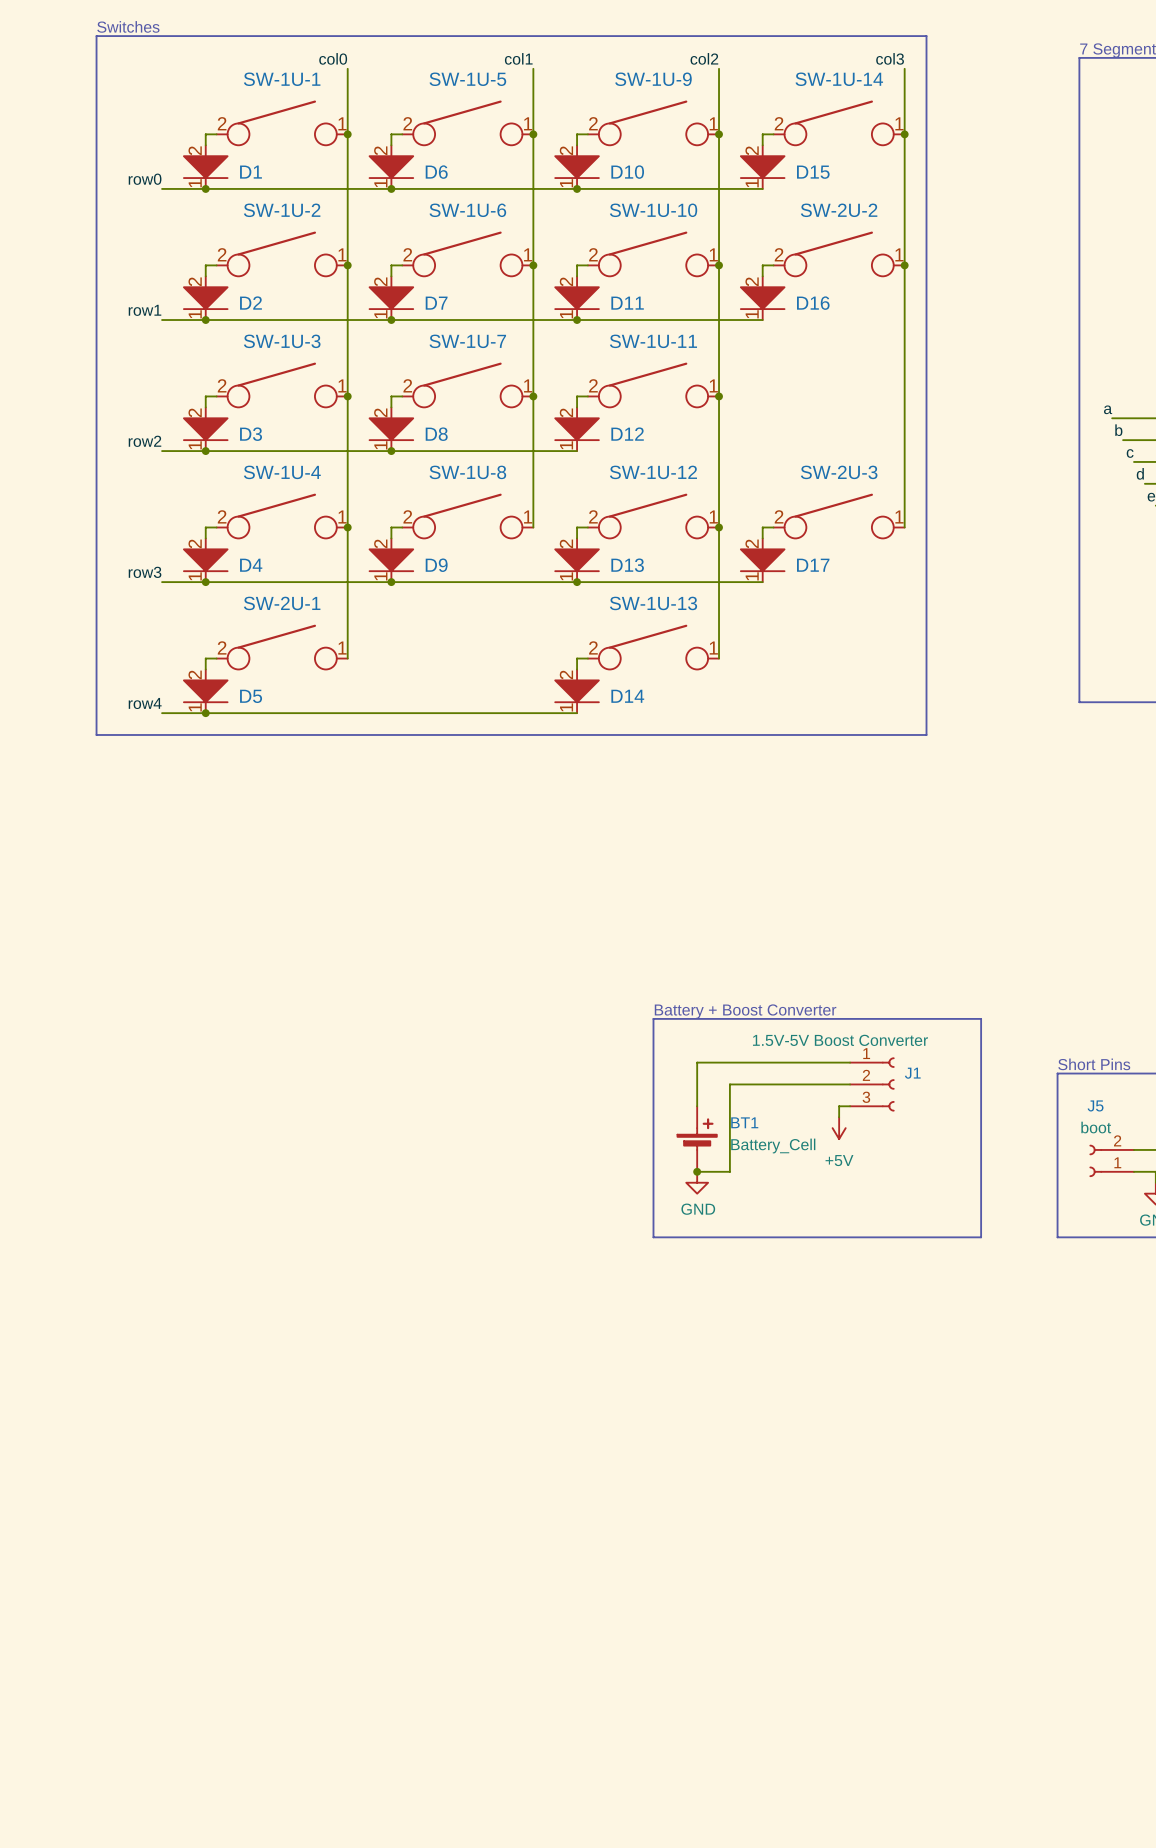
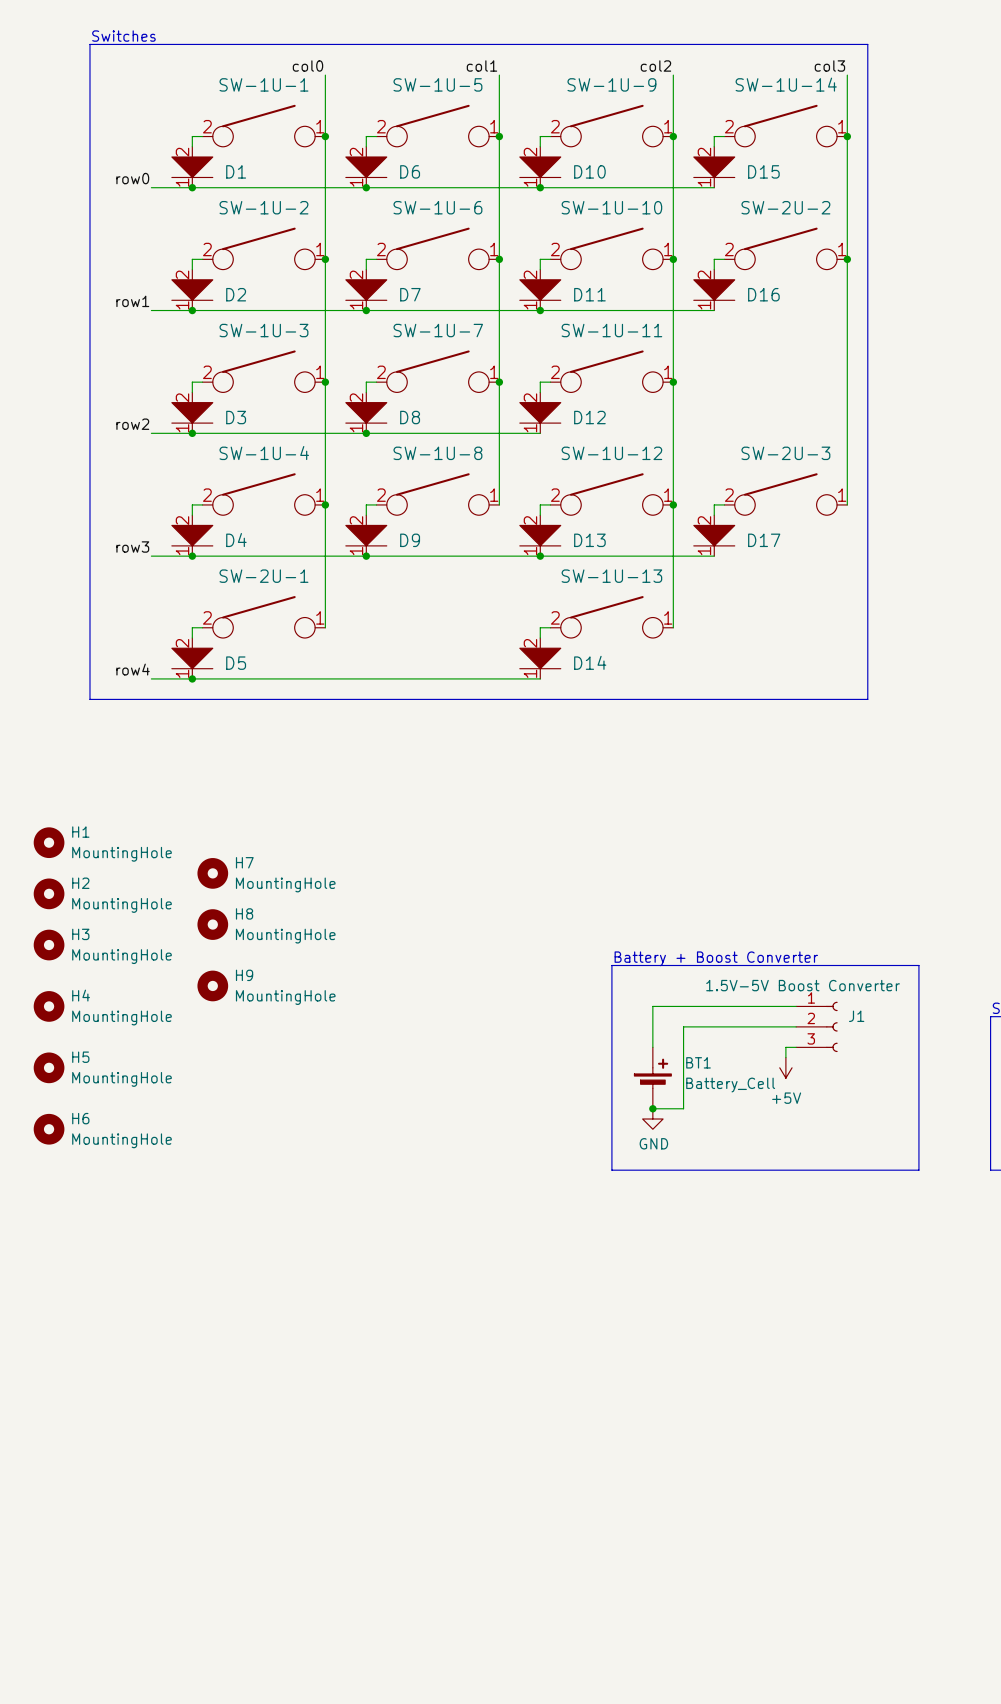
H1: none -> MountingHole (49, 842)
H7: none -> MountingHole (212, 873)
H2: none -> MountingHole (49, 893)
H8: none -> MountingHole (212, 924)
H3: none -> MountingHole (49, 945)
H9: none -> MountingHole (212, 985)
H4: none -> MountingHole (49, 1006)
H5: none -> MountingHole (49, 1067)
H6: none -> MountingHole (49, 1129)

